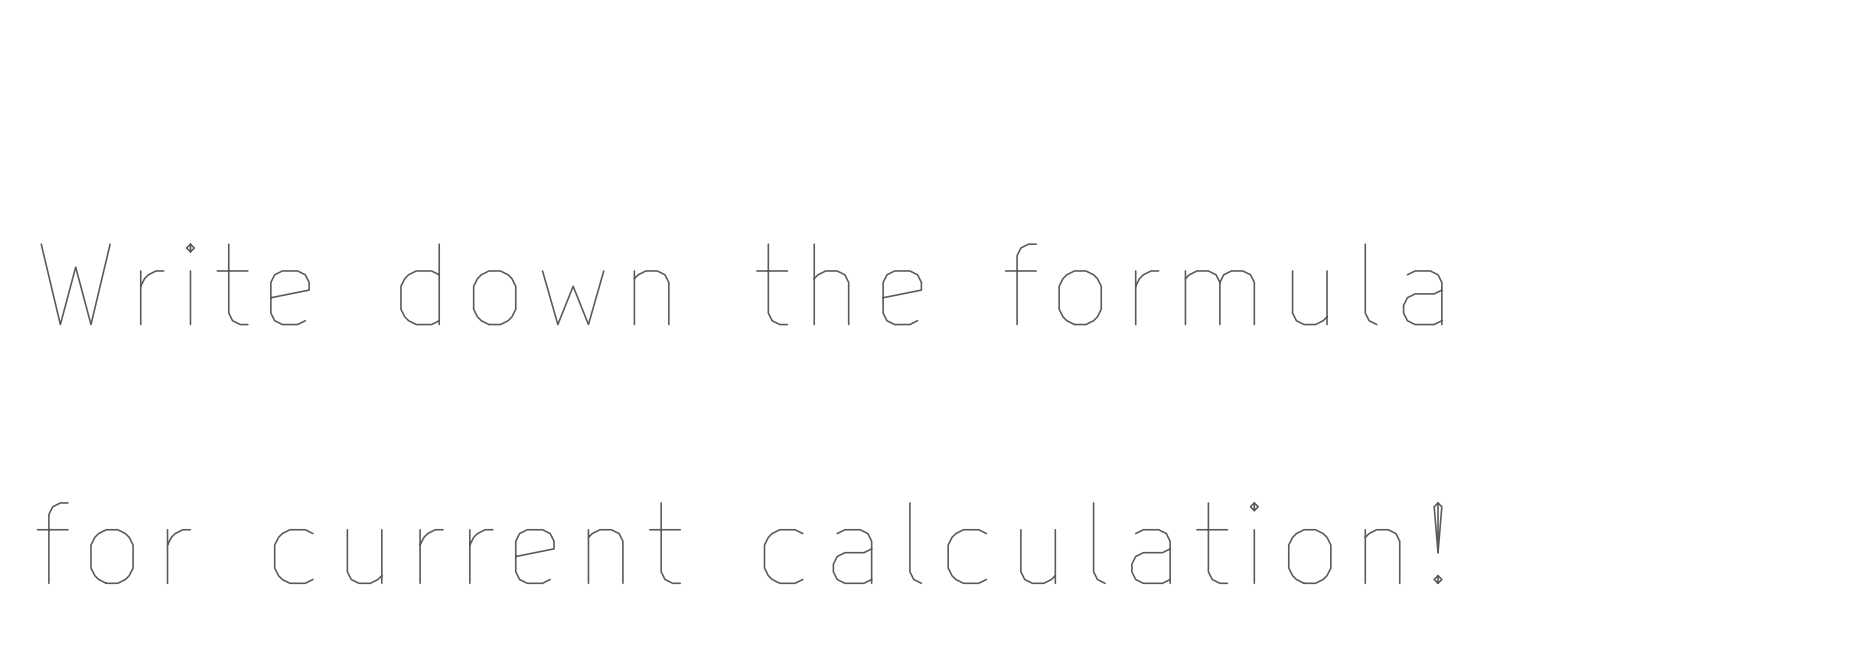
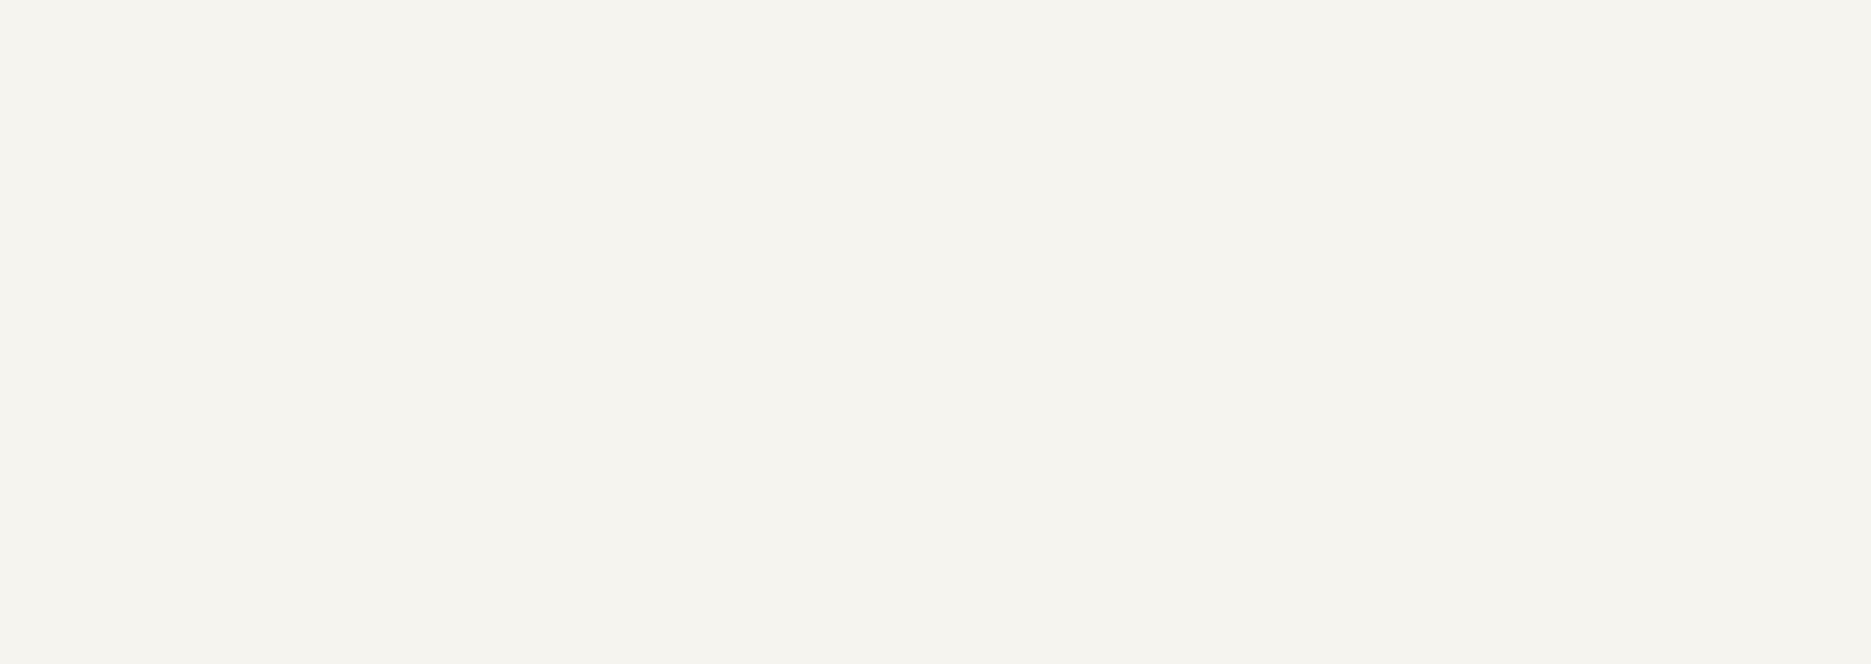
text: Write down the formula (741, 284) -> none
text: for current calculation! (739, 543) -> none

